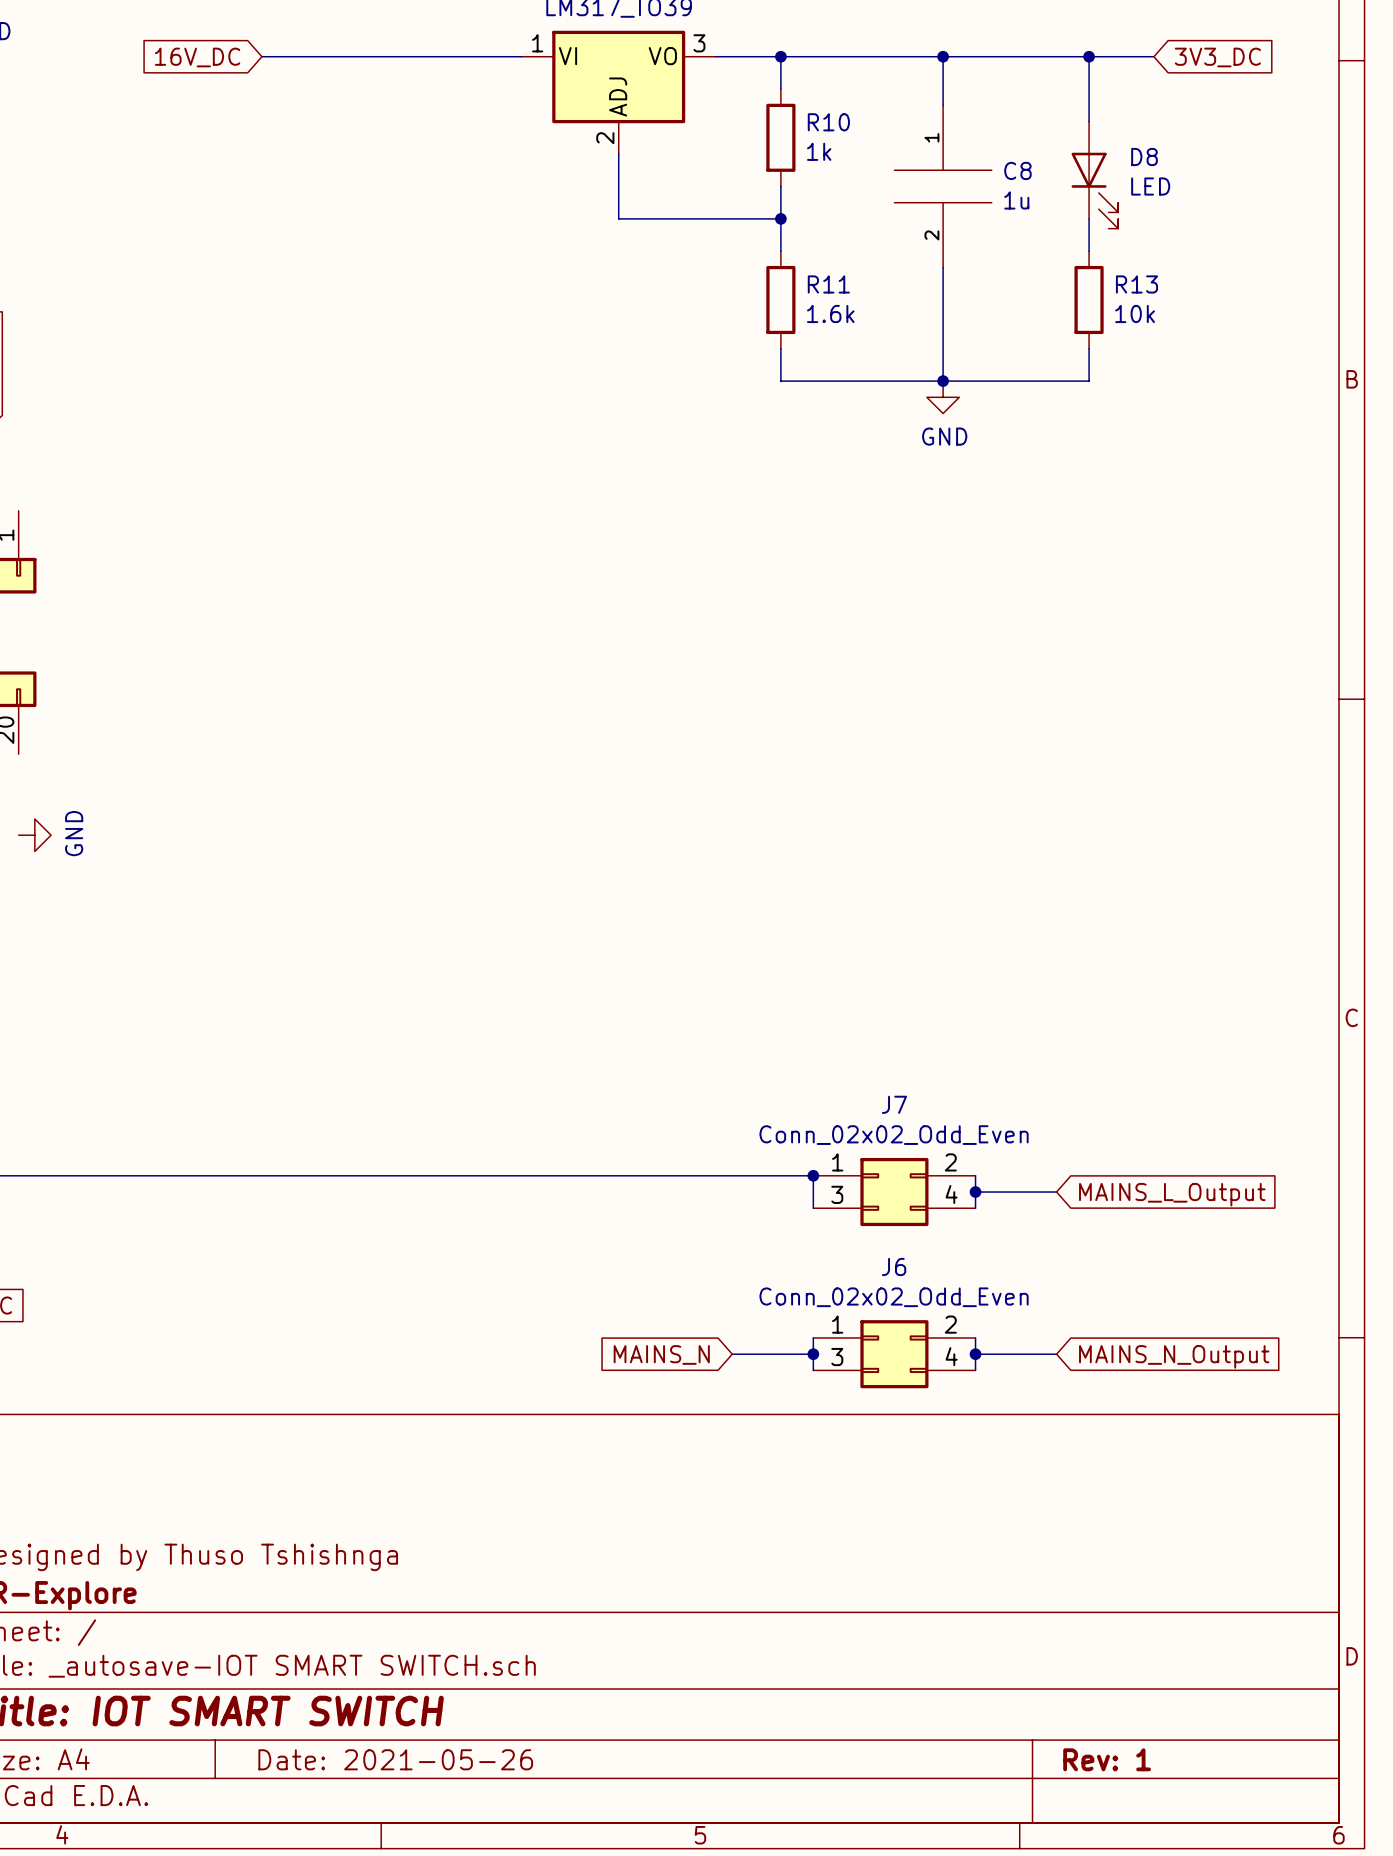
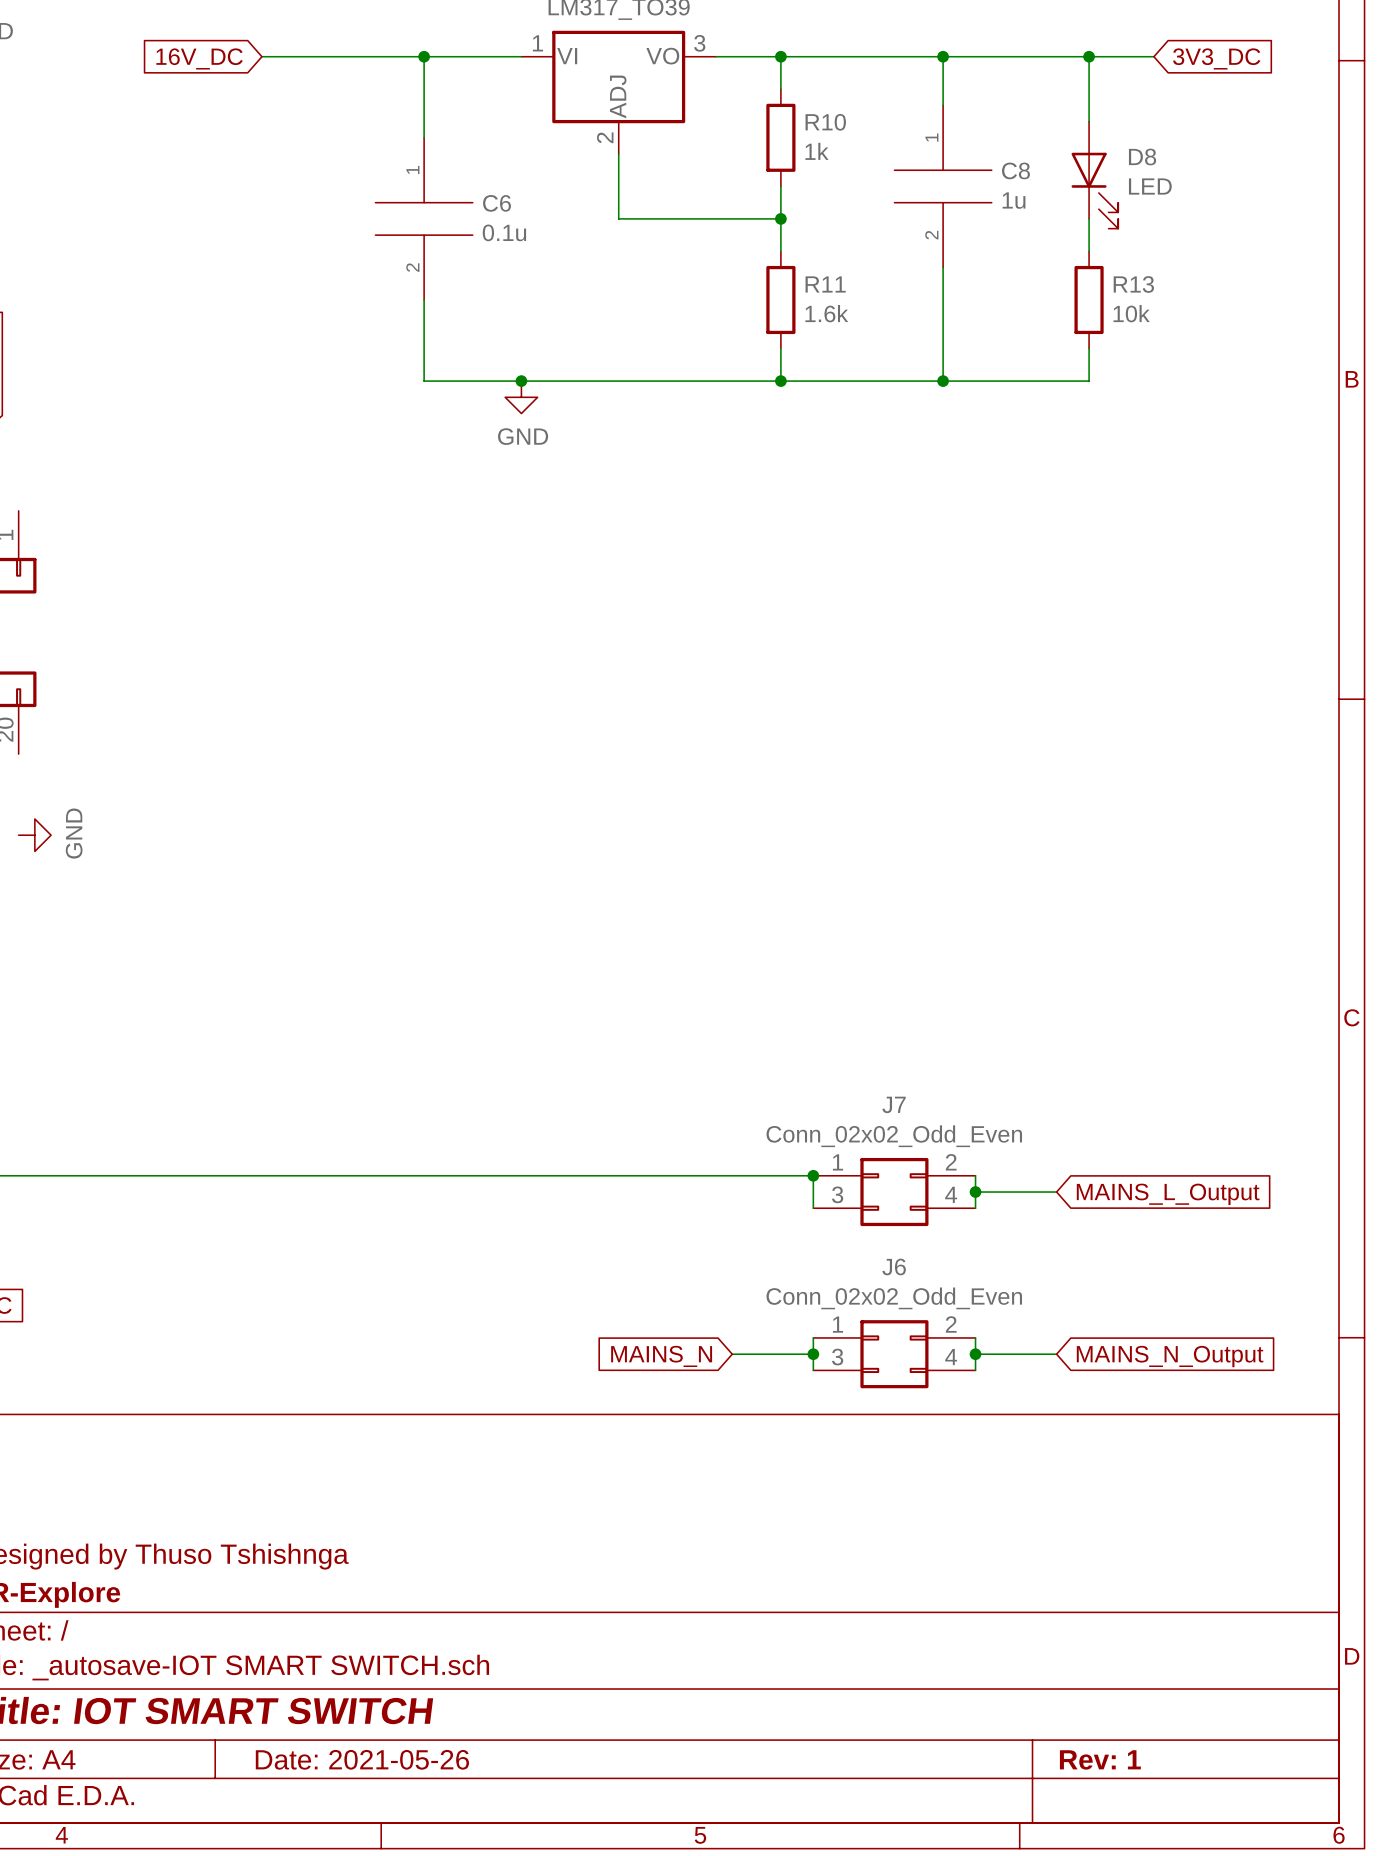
wire: none -> (424, 56) (424, 137)
junction: none -> (424, 56)
C6: none -> 0.1u (424, 218)
wire: none -> (424, 300) (424, 381) (780, 381)
junction: none -> (521, 381)
junction: none -> (780, 381)
power symbol: none -> GND (521, 397)
power symbol: GND (943, 397) -> none

